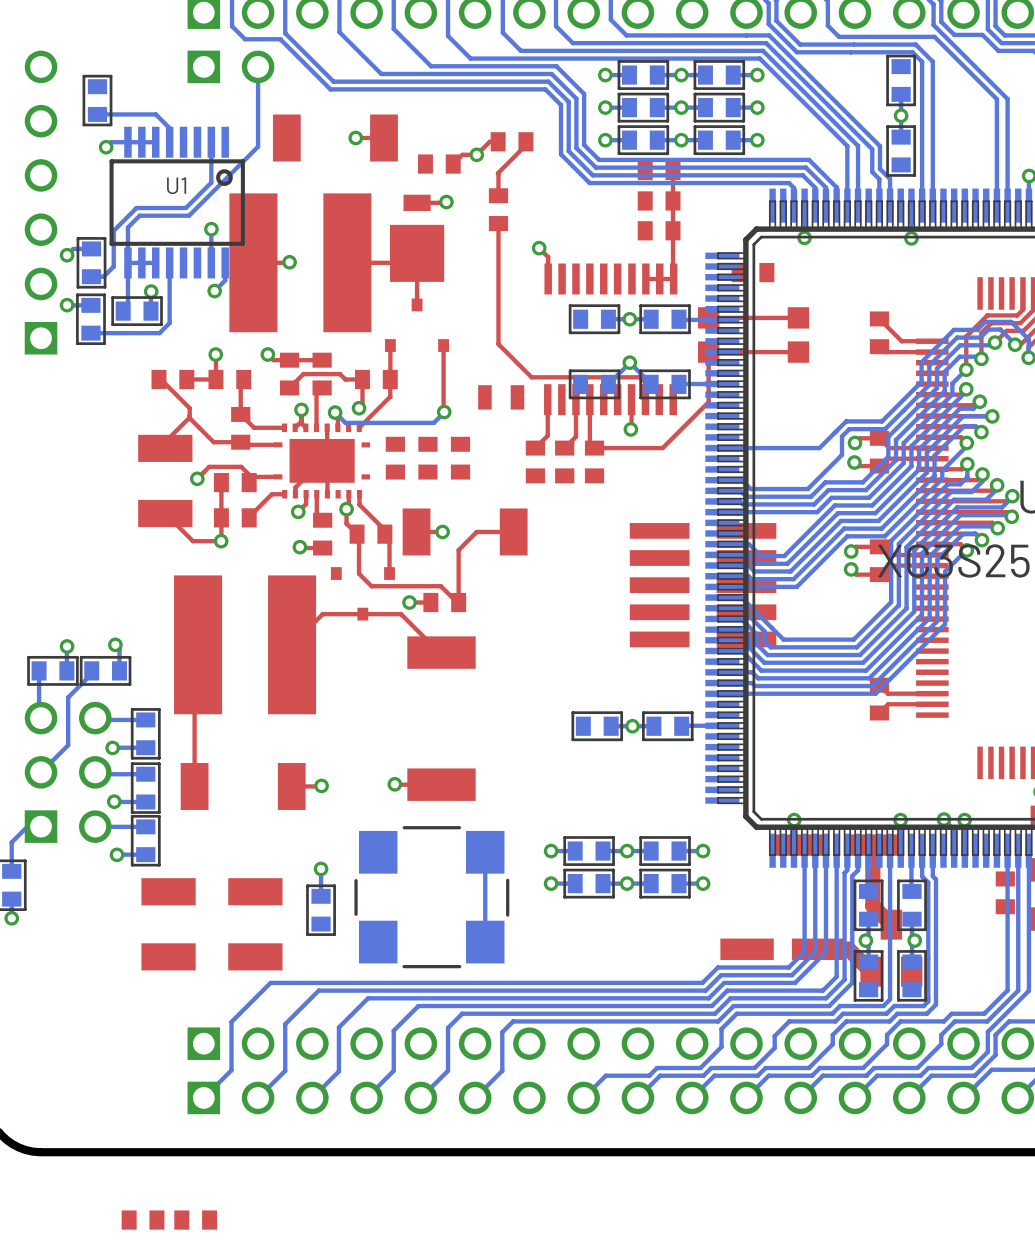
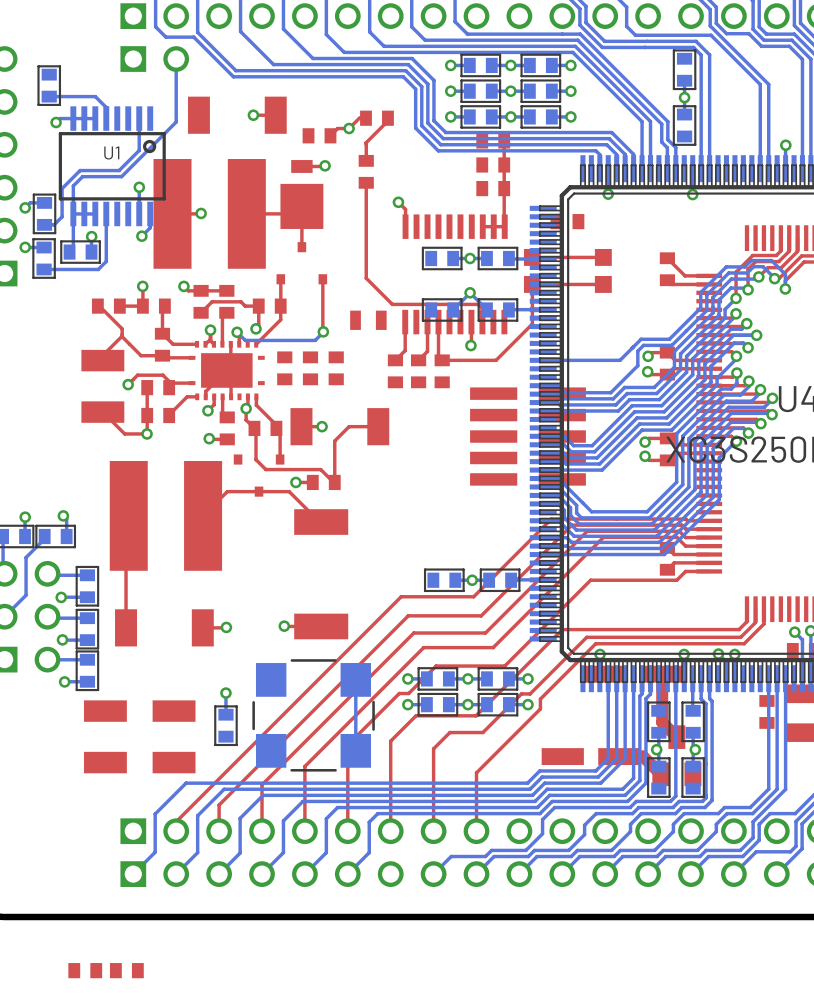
part position: (703, 585) -> (527, 436)
top track: none -> (709, 520) (551, 519) (473, 596) (401, 596) (176, 821) (176, 831)
top track: none -> (709, 529) (685, 529) (681, 525) (571, 525) (481, 615) (408, 615) (219, 805) (219, 831)
top track: none -> (709, 537) (685, 537) (679, 531) (587, 531) (485, 633) (413, 633) (262, 784) (262, 831)
top track: none -> (709, 546) (685, 546) (676, 537) (603, 537) (493, 647) (423, 647) (304, 766) (304, 831)
top track: none -> (709, 571) (685, 571) (676, 580) (590, 580) (504, 666) (436, 666) (408, 693) (399, 693) (347, 744) (347, 831)
top track: none -> (746, 609) (746, 621) (739, 629) (562, 629) (476, 715) (416, 715) (390, 741) (390, 831)
top track: none -> (755, 609) (755, 622) (740, 637) (586, 637) (530, 693) (521, 693) (482, 732) (449, 732) (433, 748) (433, 831)
top track: none -> (763, 609) (763, 624) (744, 643) (595, 643) (540, 699) (540, 708) (476, 772) (476, 831)

